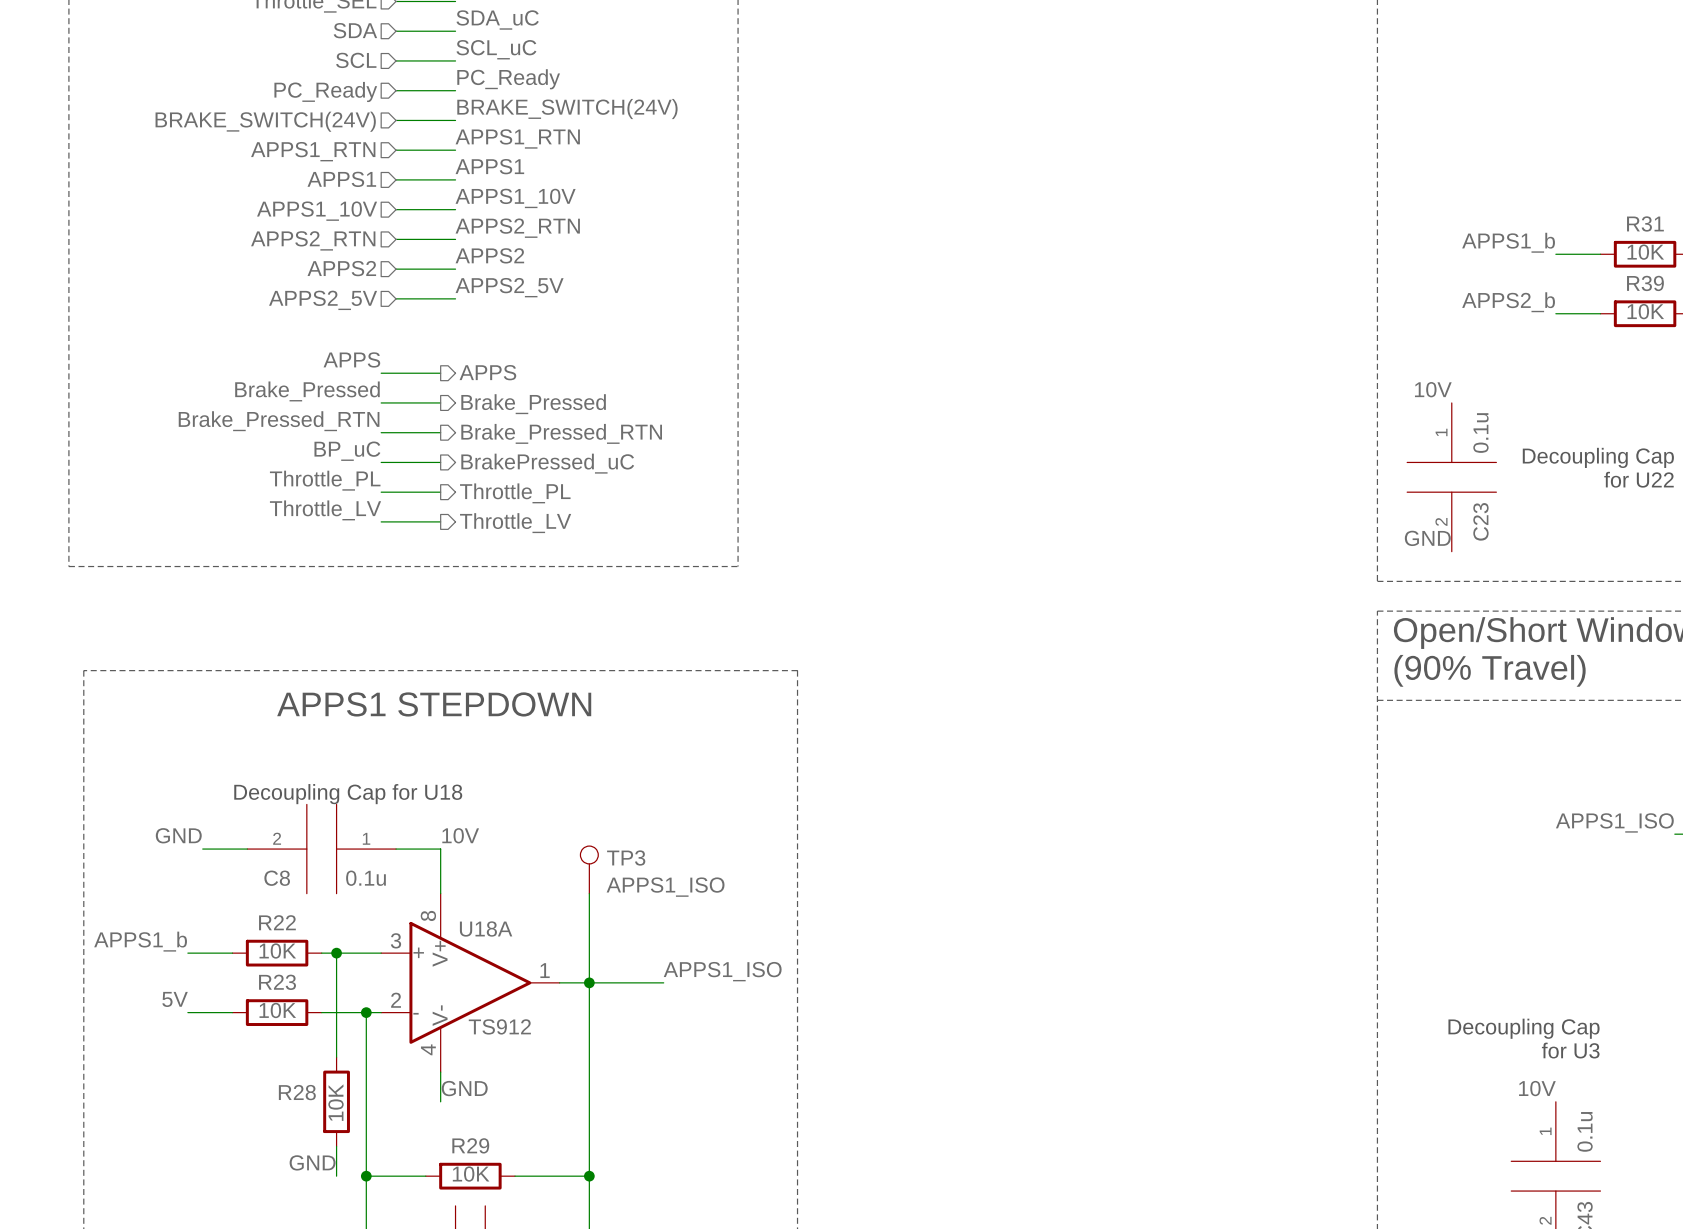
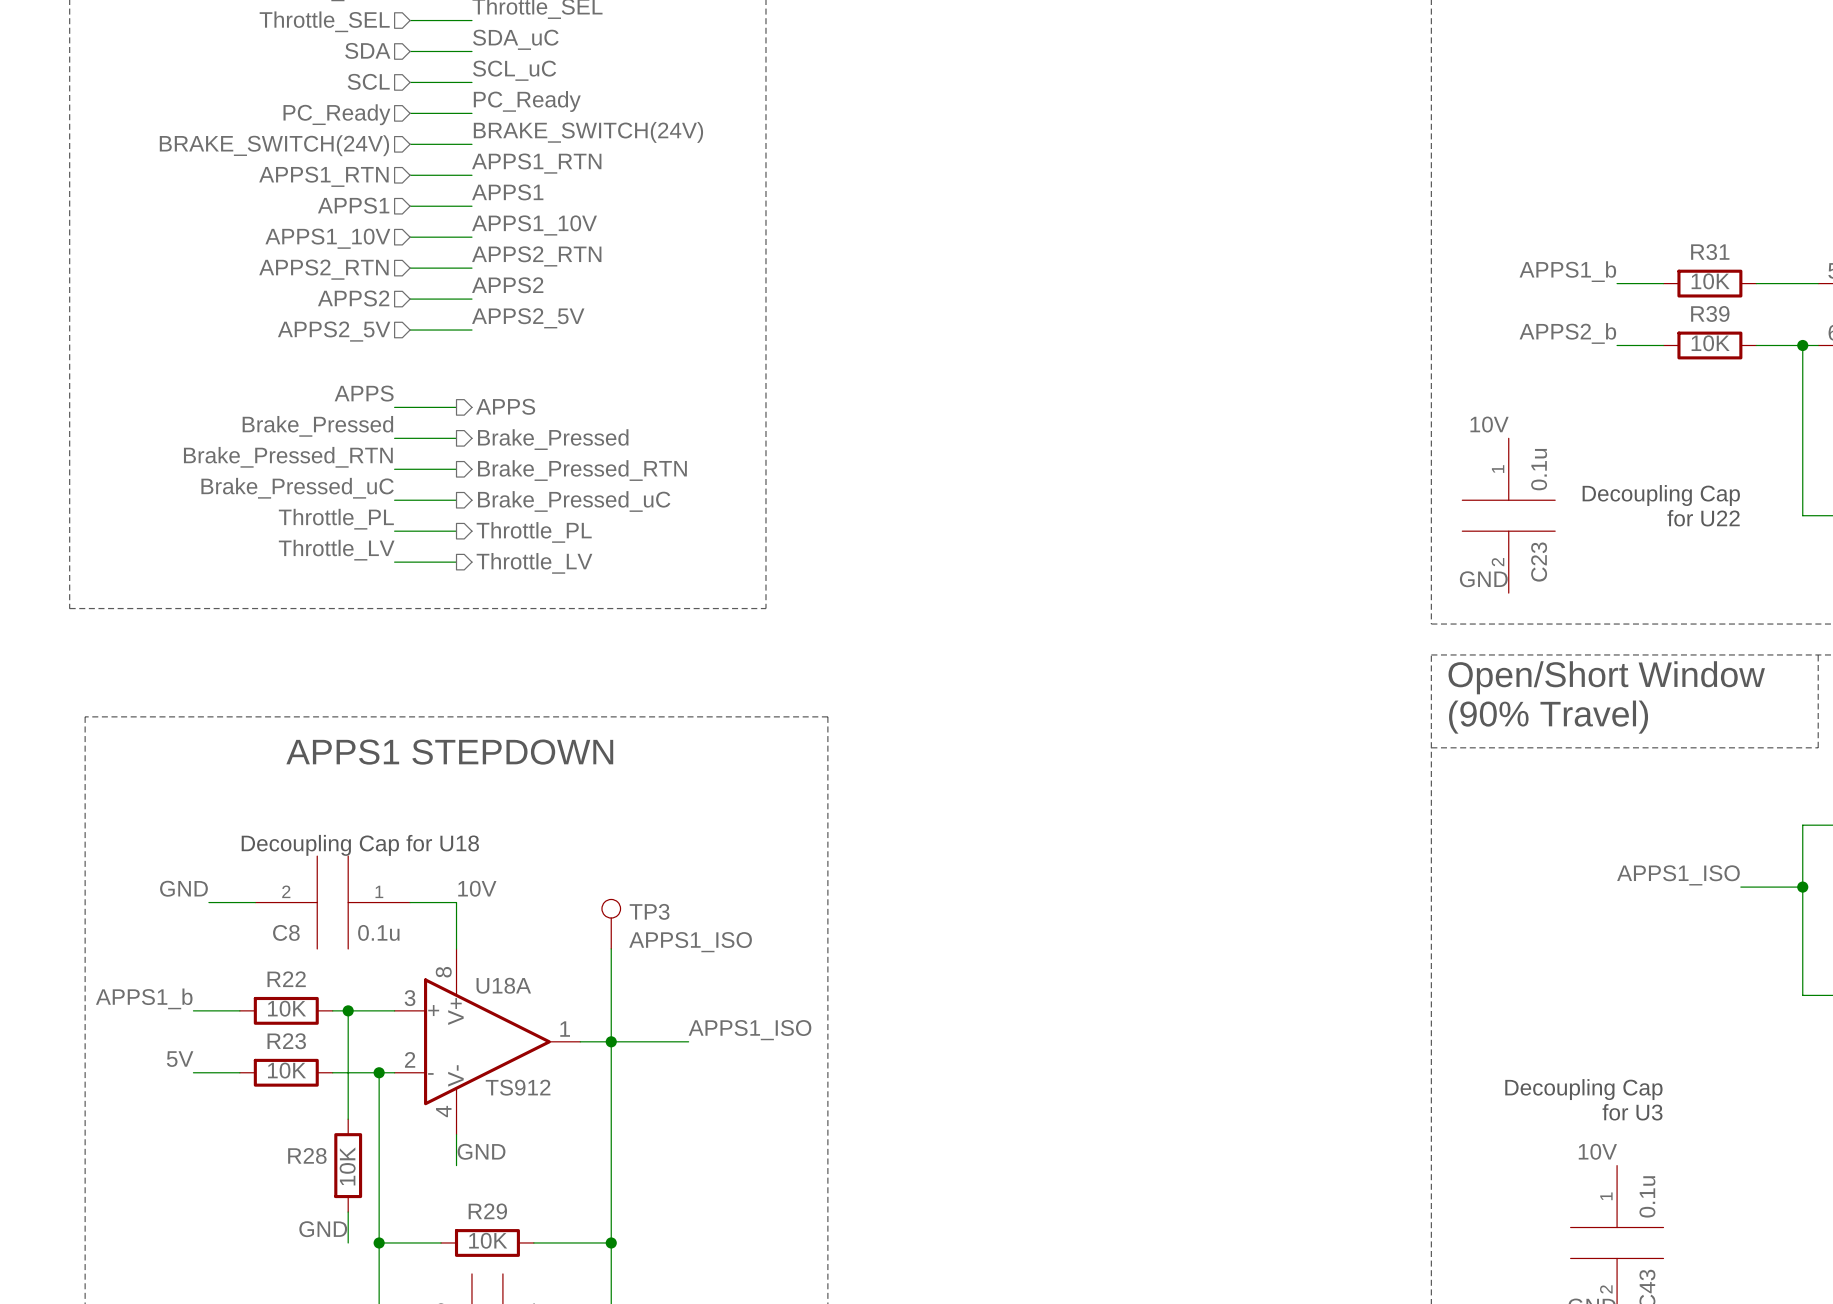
label: BP_uC (347, 451) -> Brake_Pressed_uC (297, 488)
hierarchical label: BrakePressed_uC (547, 463) -> Brake_Pressed_uC (574, 501)

